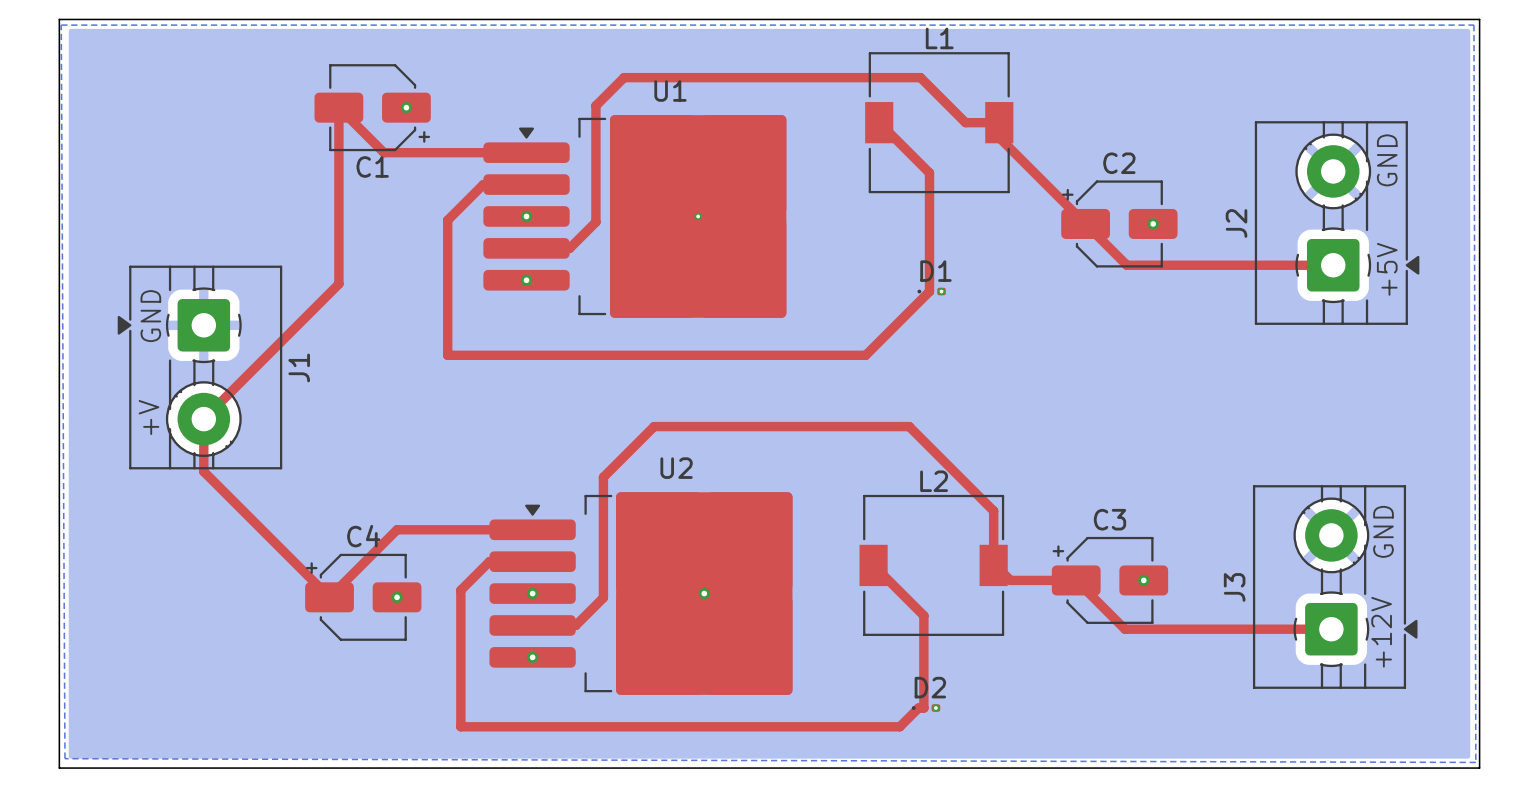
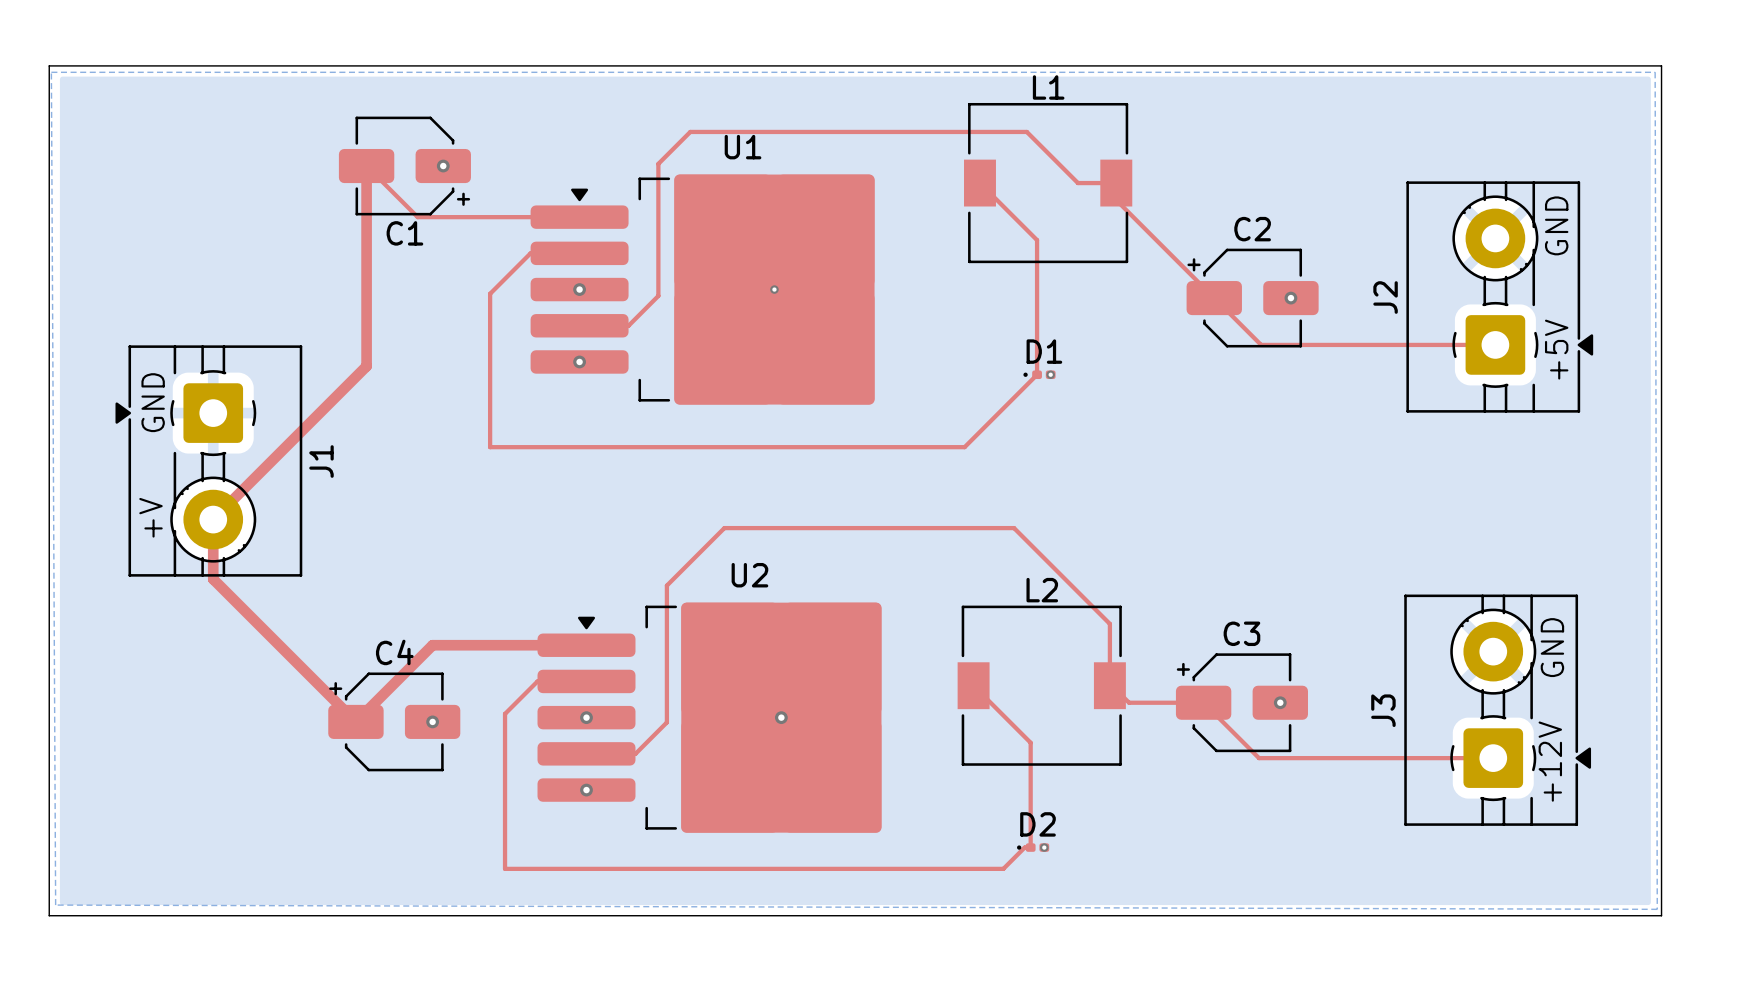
top track width: thick (338, 107) (383, 152) (526, 152) -> thin (366, 166) (417, 217) (579, 217)
top track width: thick (879, 122) (929, 172) (929, 291) (865, 355) (447, 355) (447, 220) (483, 184) (526, 184) -> thin (979, 183) (1037, 240) (1037, 374) (964, 447) (490, 447) (490, 293) (530, 253) (579, 253)
top track width: thick (526, 248) (569, 248) (595, 222) (595, 105) (624, 77) (920, 77) (965, 122) (999, 122) (999, 137) (1126, 265) (1333, 265) -> thin (579, 325) (628, 325) (658, 295) (658, 163) (690, 131) (1026, 131) (1077, 183) (1116, 183) (1116, 200) (1261, 344) (1495, 344)
top track width: thick (532, 561) (489, 561) (460, 590) (460, 726) (899, 726) (918, 708) (923, 708) (923, 615) (873, 565) -> thin (586, 681) (537, 681) (505, 713) (505, 868) (1003, 868) (1024, 847) (1030, 847) (1030, 742) (973, 685)
top track width: thick (532, 625) (575, 625) (603, 597) (603, 477) (654, 426) (909, 426) (993, 511) (993, 565) (1010, 580) (1076, 580) (1125, 629) (1331, 629) -> thin (586, 753) (635, 753) (666, 722) (666, 585) (724, 528) (1014, 528) (1109, 623) (1109, 685) (1129, 702) (1203, 702) (1258, 758) (1493, 758)

